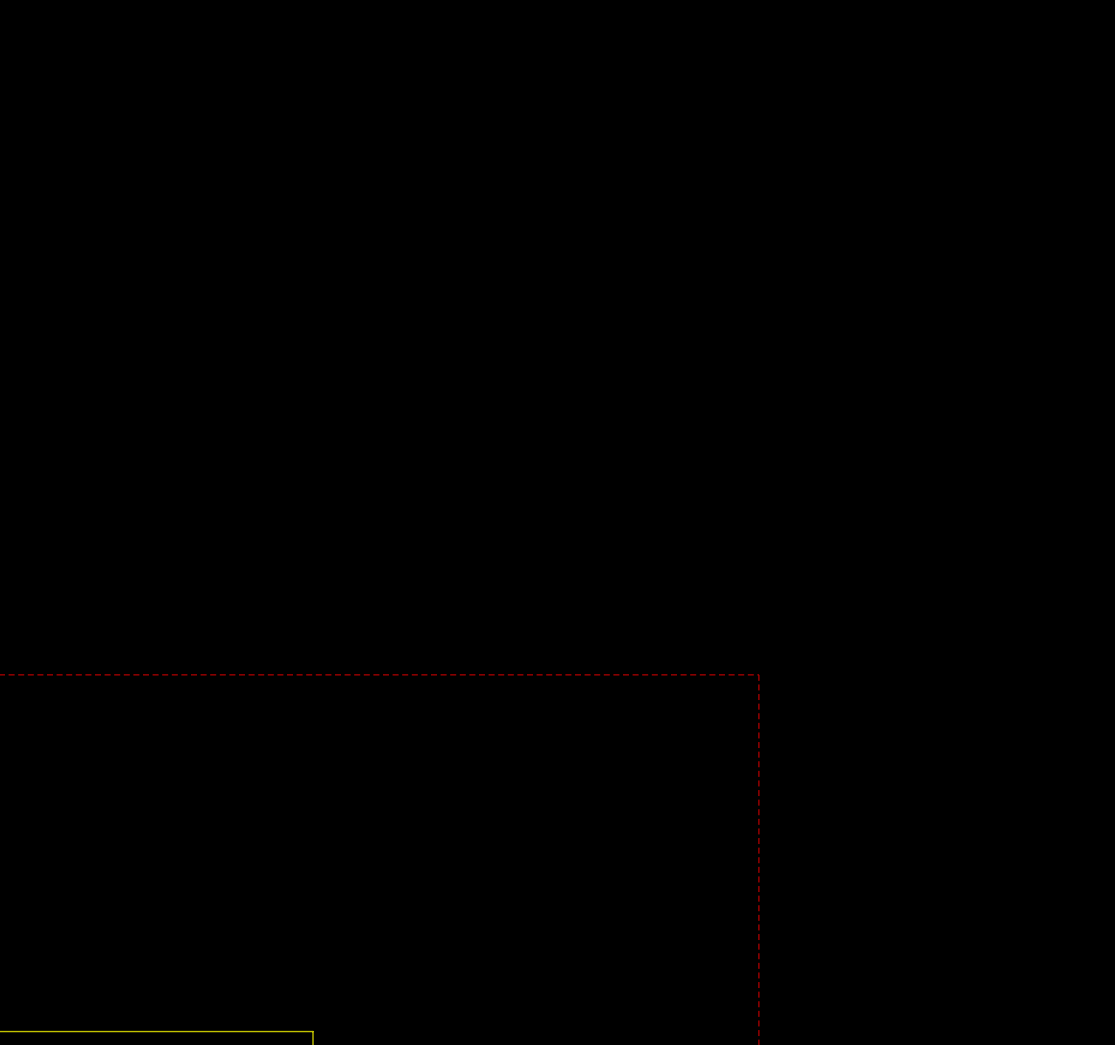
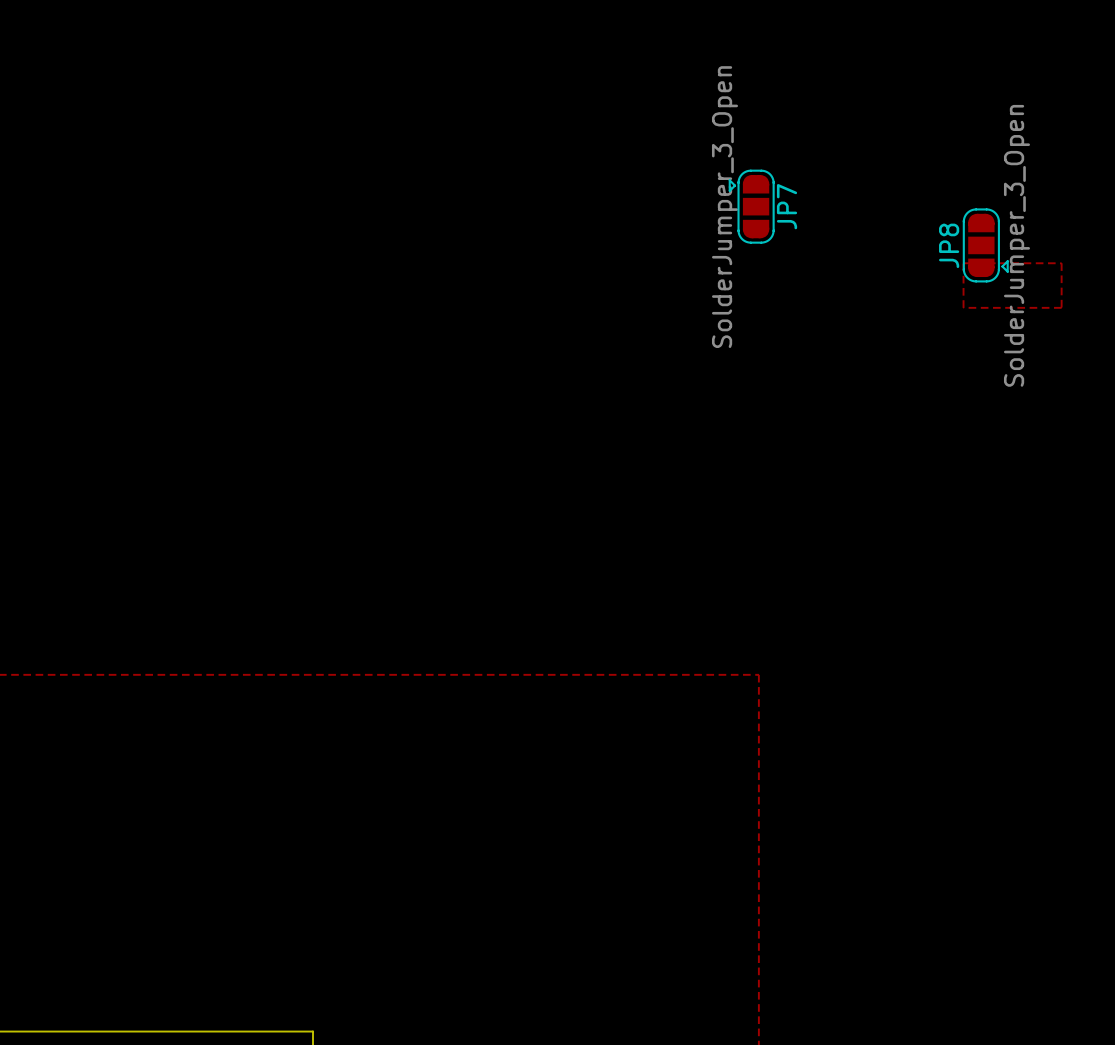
JP7: none -> SolderJumper_3_Open (751, 206)
JP8: none -> SolderJumper_3_Open (985, 245)
zone outline: none -> (963, 263) (1061, 263) (1061, 307) (963, 307) (963, 263)

